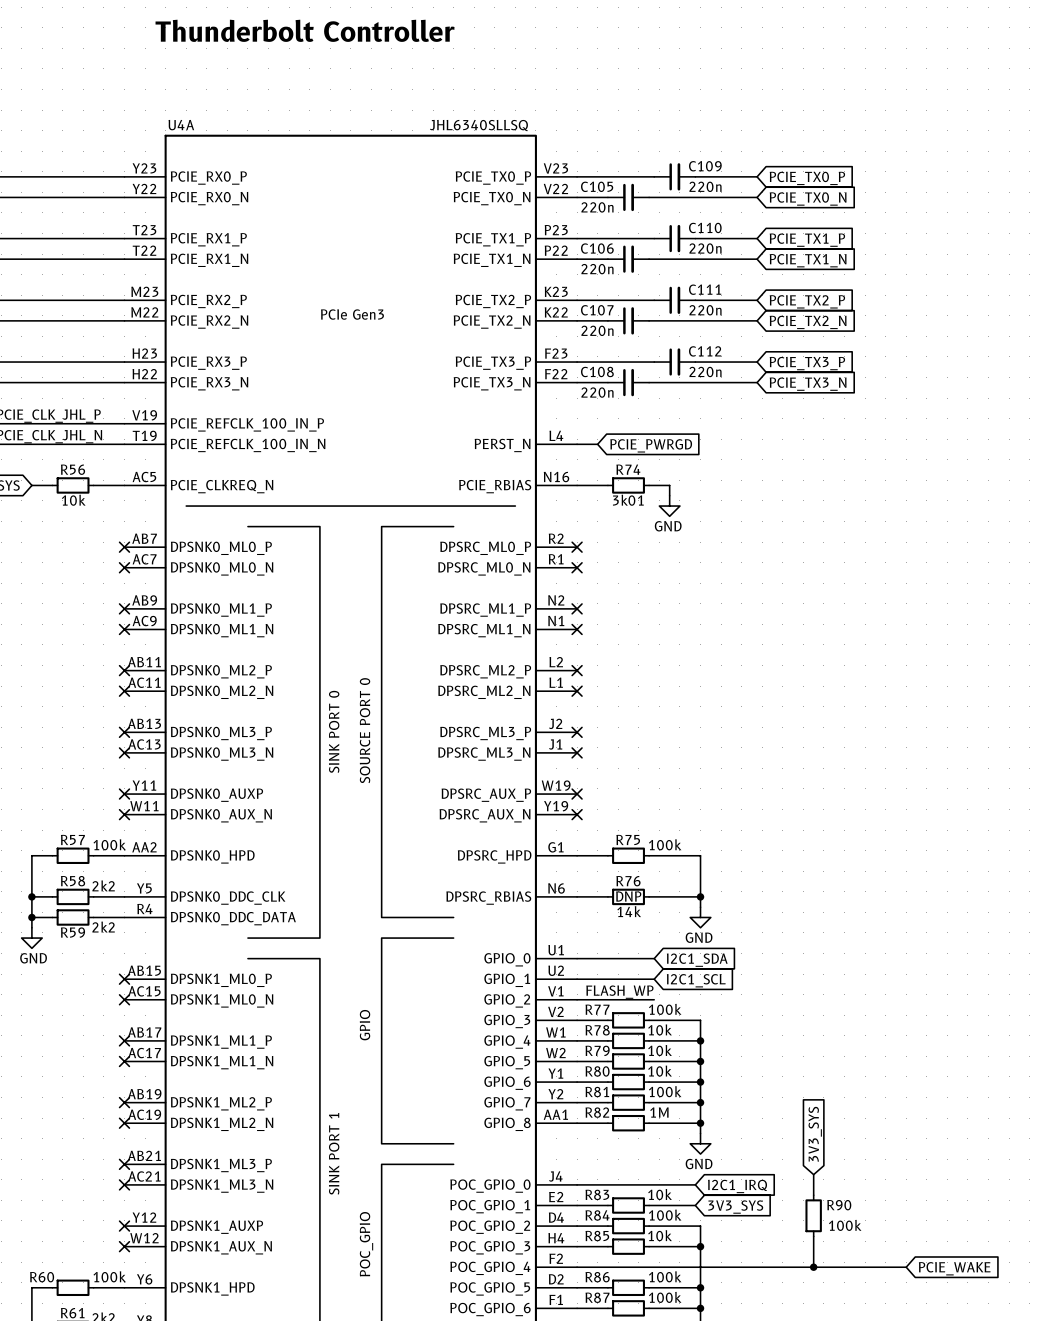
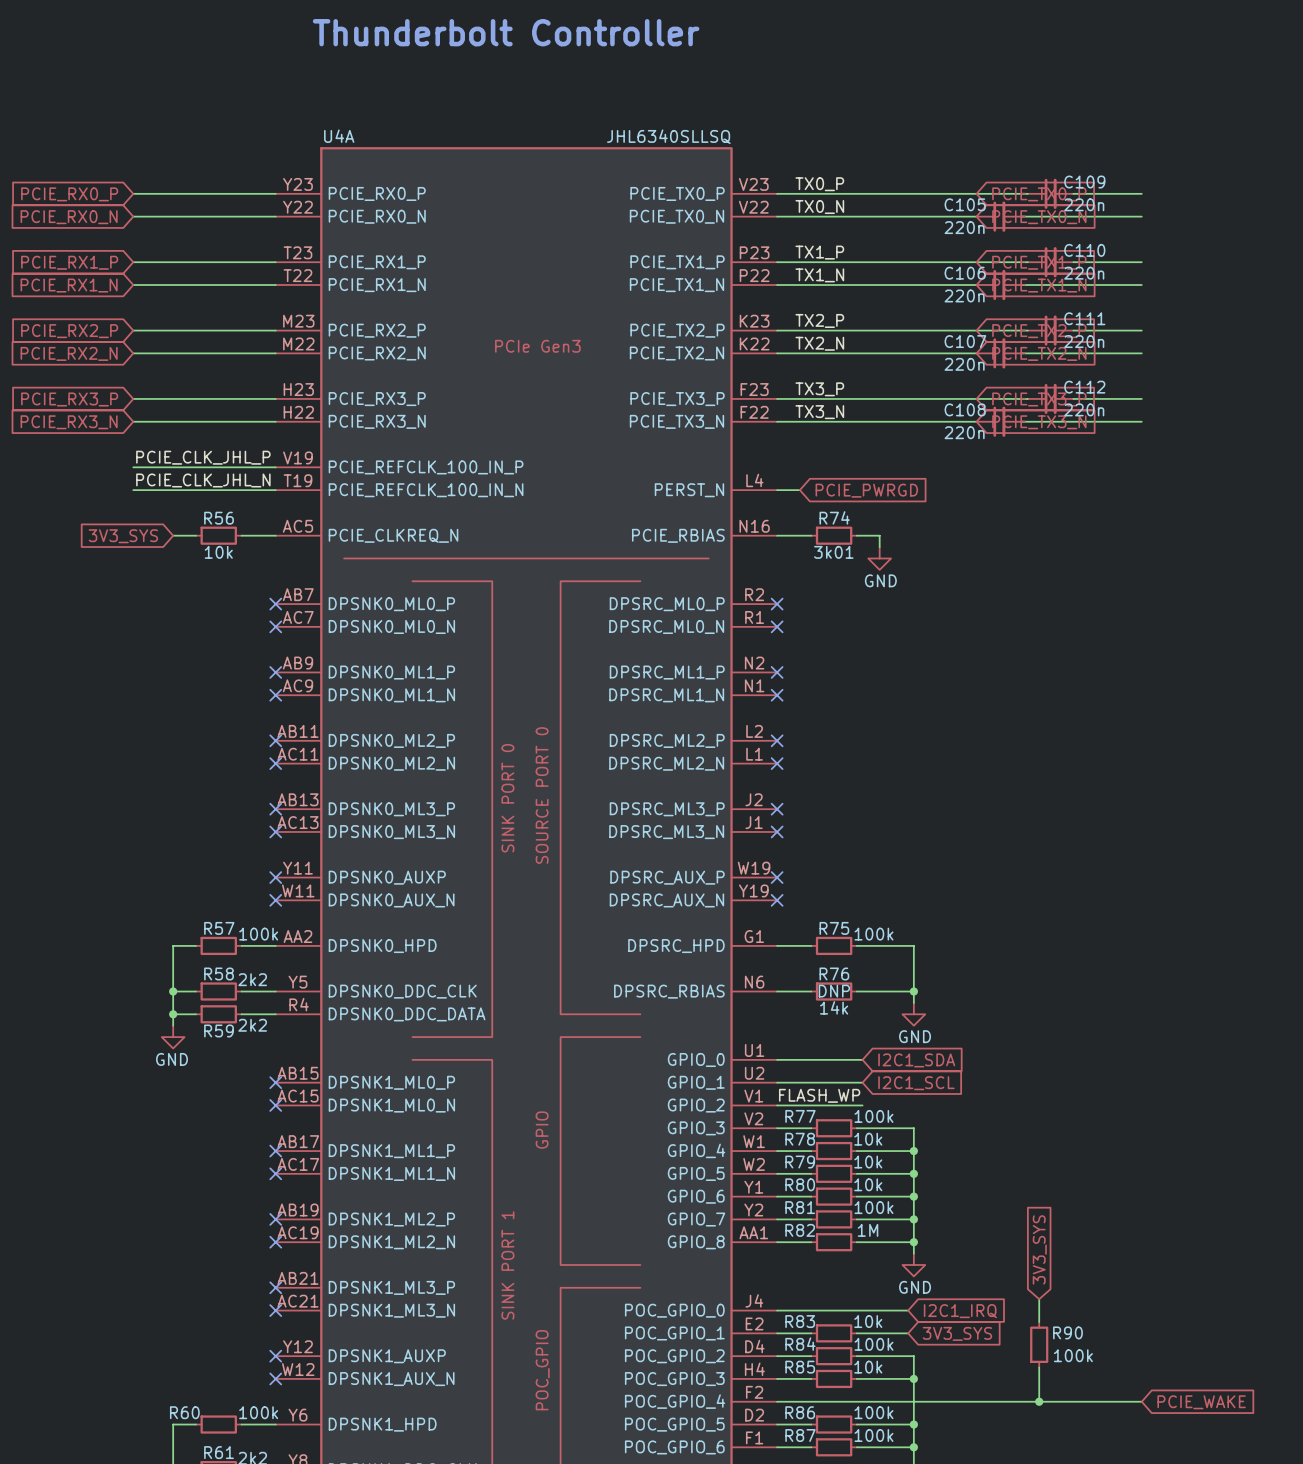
label: none -> TX0_P (819, 184)
C109 position: (674, 176) -> (1050, 193)
wire: none -> (976, 193) (1027, 193)
wire: none -> (1073, 193) (1141, 193)
label: none -> TX0_N (819, 207)
C105 position: (628, 197) -> (999, 216)
wire: none -> (1022, 216) (1141, 216)
label: none -> TX1_P (819, 252)
C110 position: (674, 238) -> (1050, 262)
wire: none -> (976, 262) (1027, 262)
wire: none -> (1073, 262) (1141, 262)
label: none -> TX1_N (819, 275)
C106 position: (628, 259) -> (999, 285)
wire: none -> (1022, 285) (1141, 285)
label: none -> TX2_P (819, 320)
C111 position: (674, 300) -> (1050, 330)
wire: none -> (976, 330) (1027, 330)
wire: none -> (1073, 330) (1141, 330)
label: none -> TX2_N (819, 343)
C107 position: (628, 320) -> (999, 353)
wire: none -> (1022, 353) (1141, 353)
label: none -> TX3_P (819, 389)
C112 position: (674, 362) -> (1050, 398)
wire: none -> (976, 398) (1027, 398)
wire: none -> (1073, 398) (1141, 398)
label: none -> TX3_N (819, 412)
C108 position: (628, 382) -> (999, 421)
wire: none -> (1022, 421) (1141, 421)

